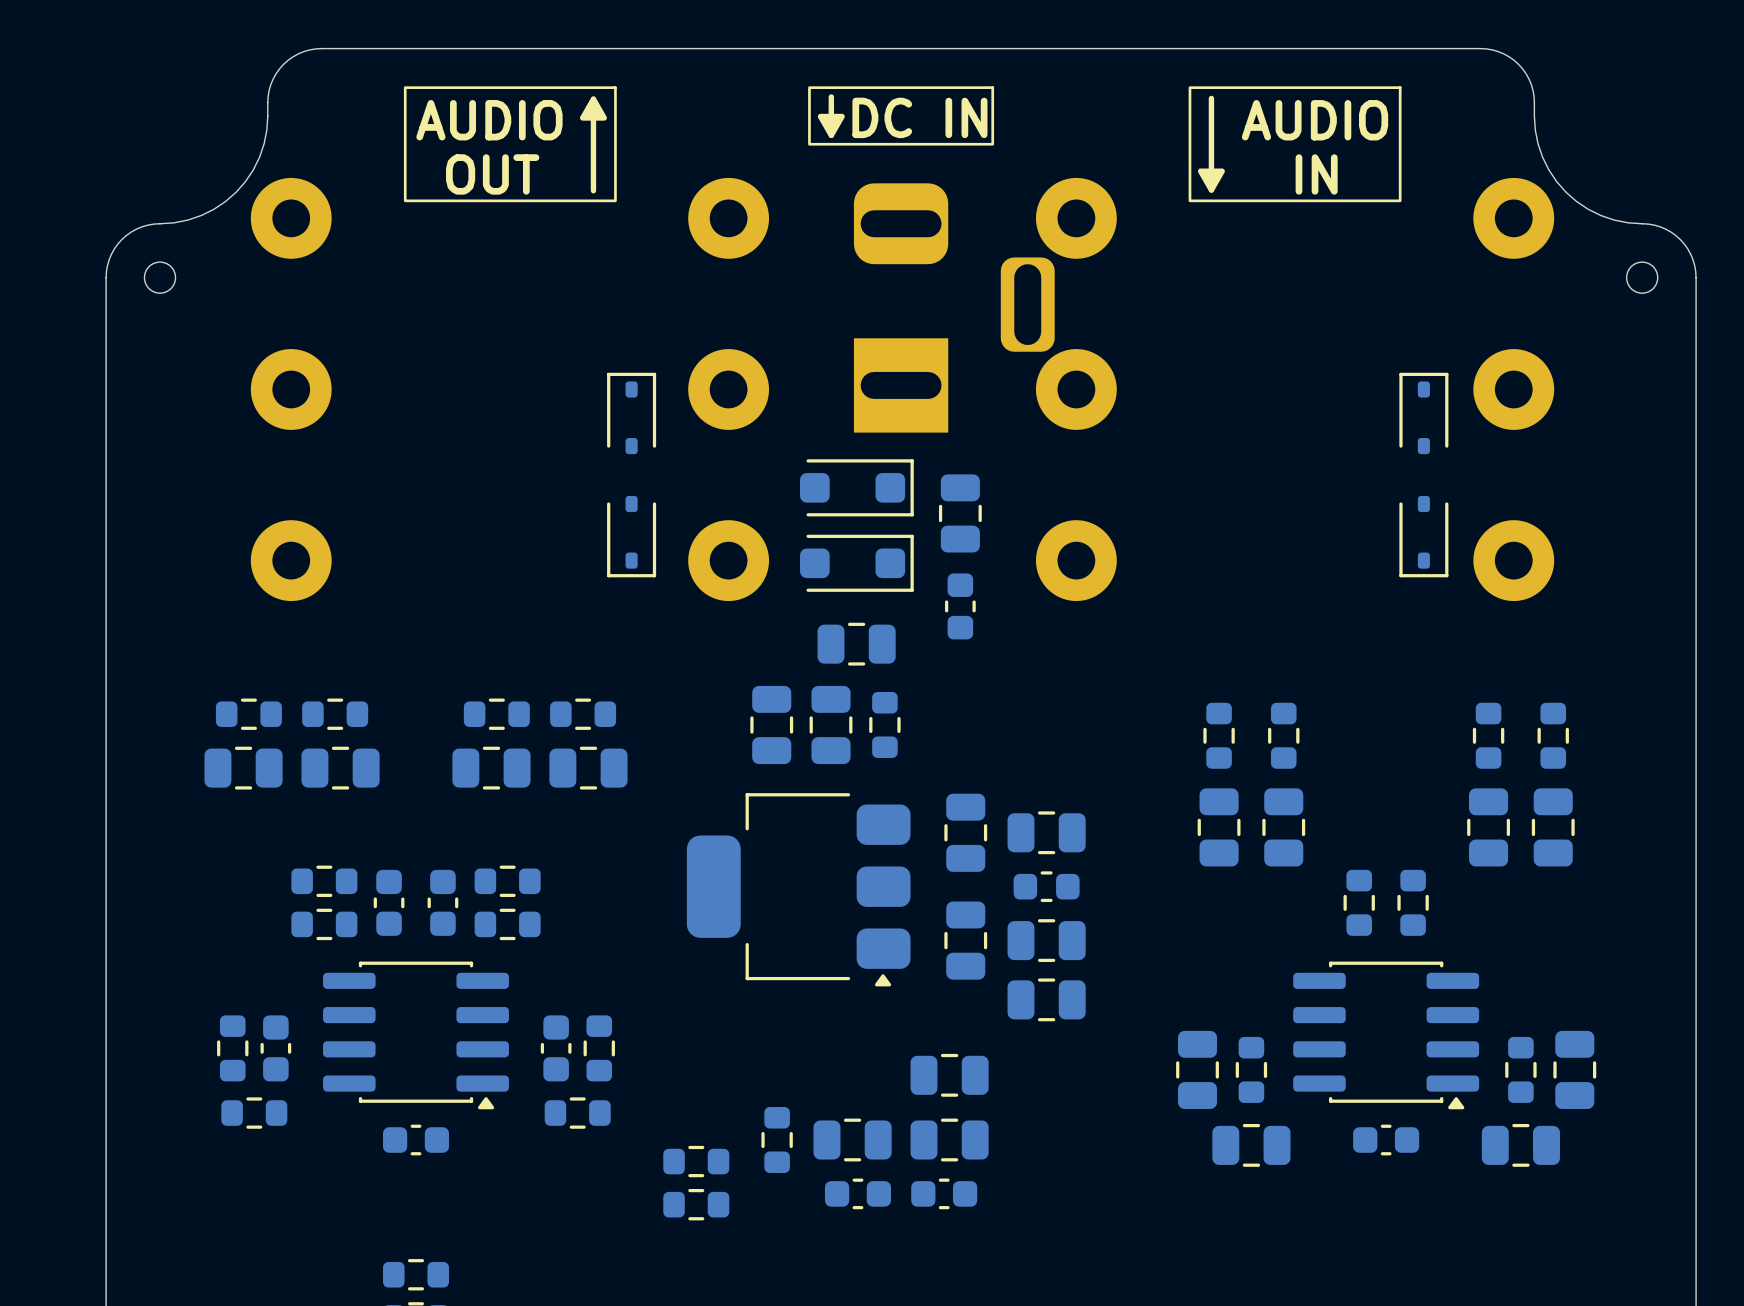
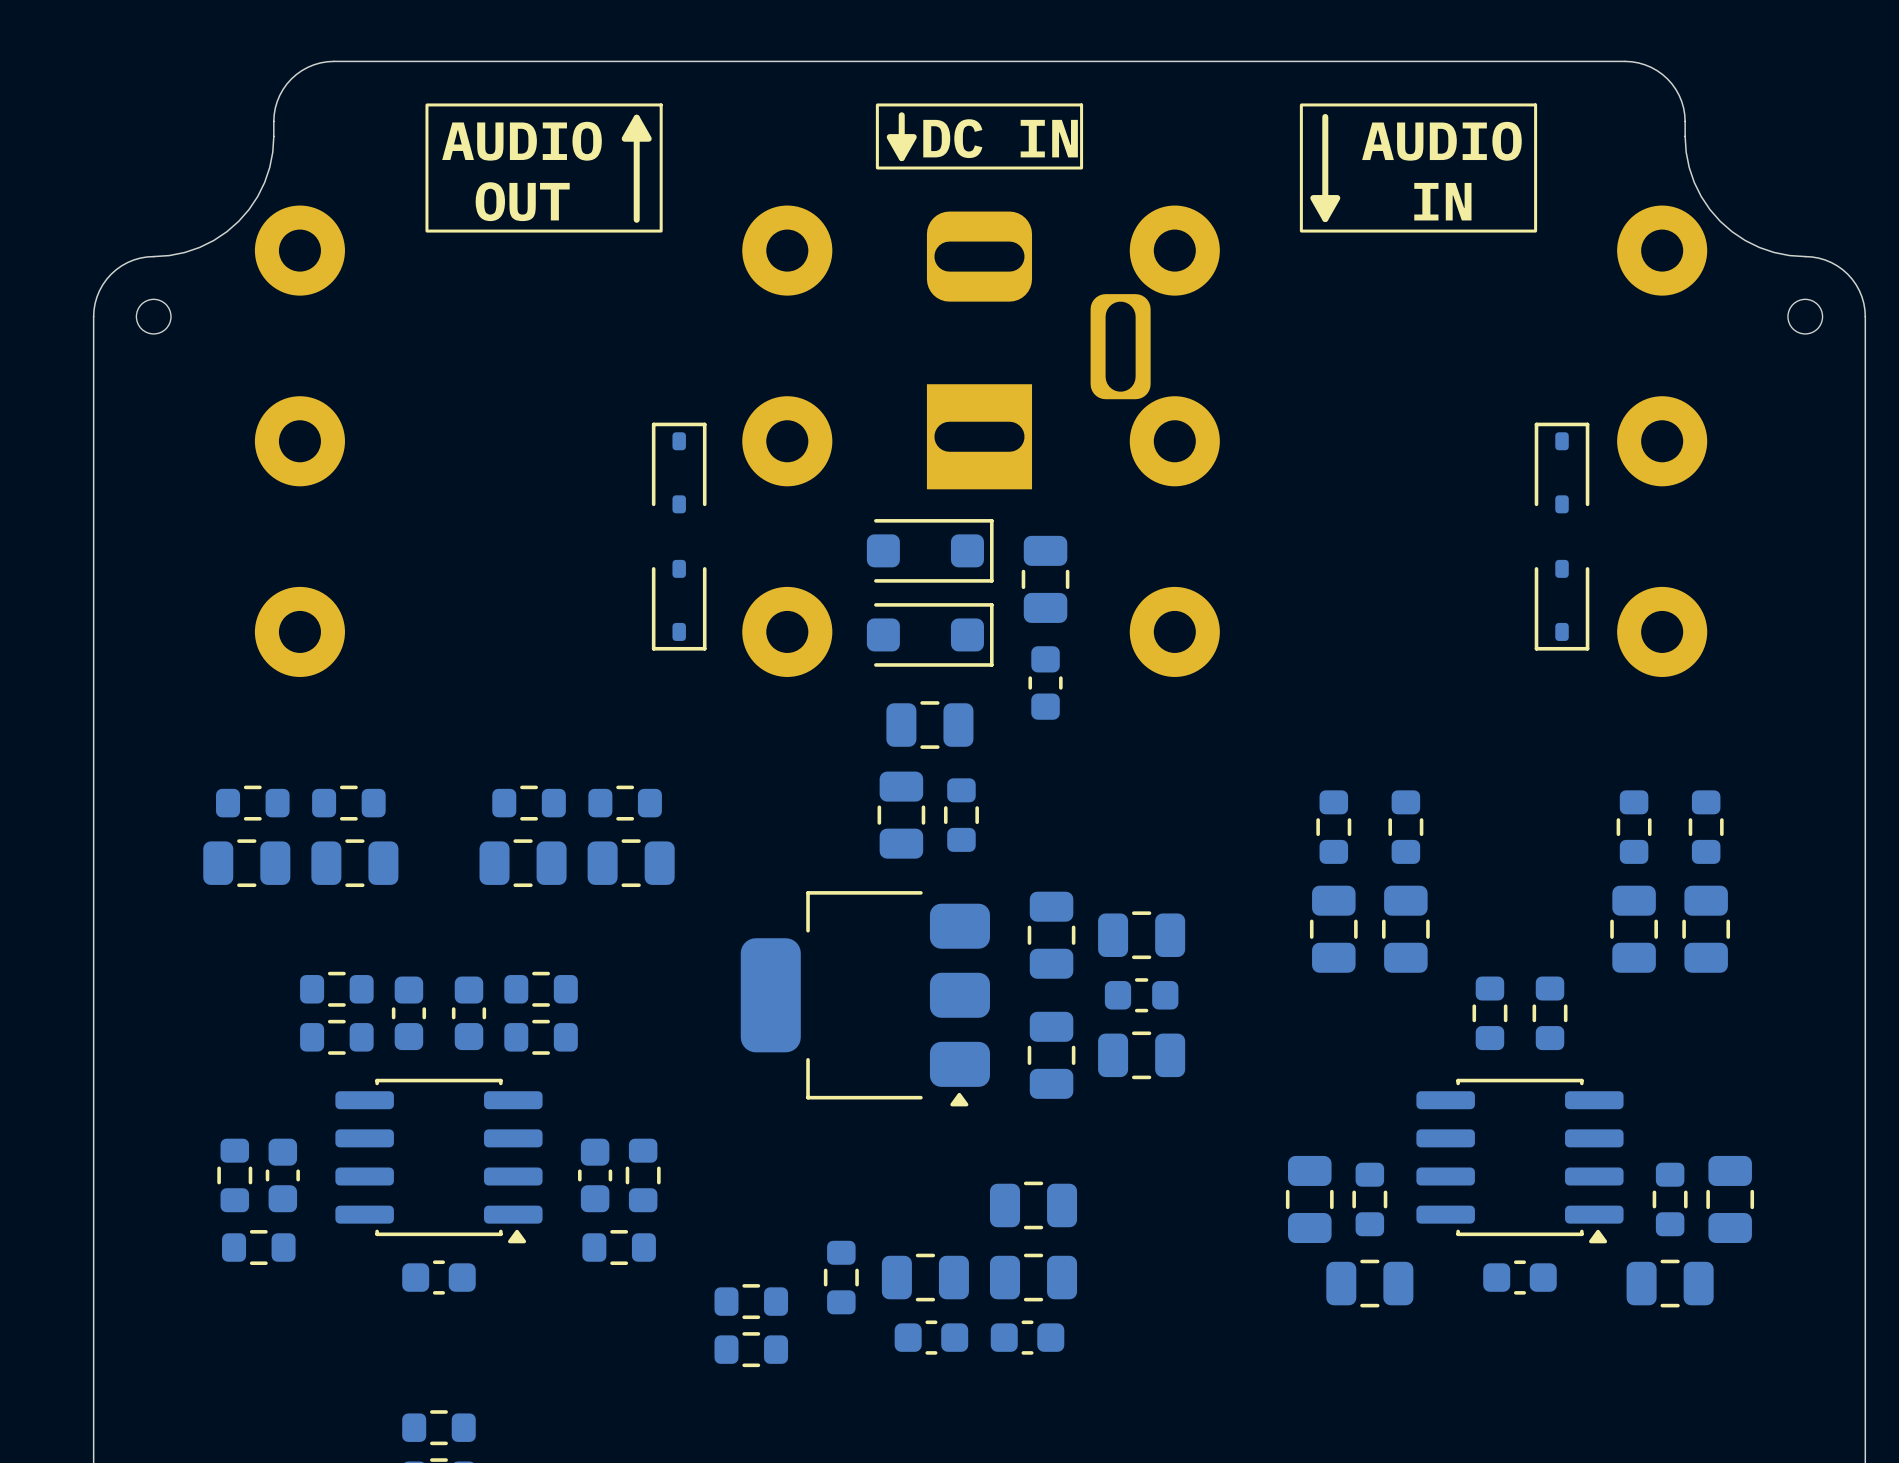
part: (771, 724) -> none
part: (1046, 999) -> none

